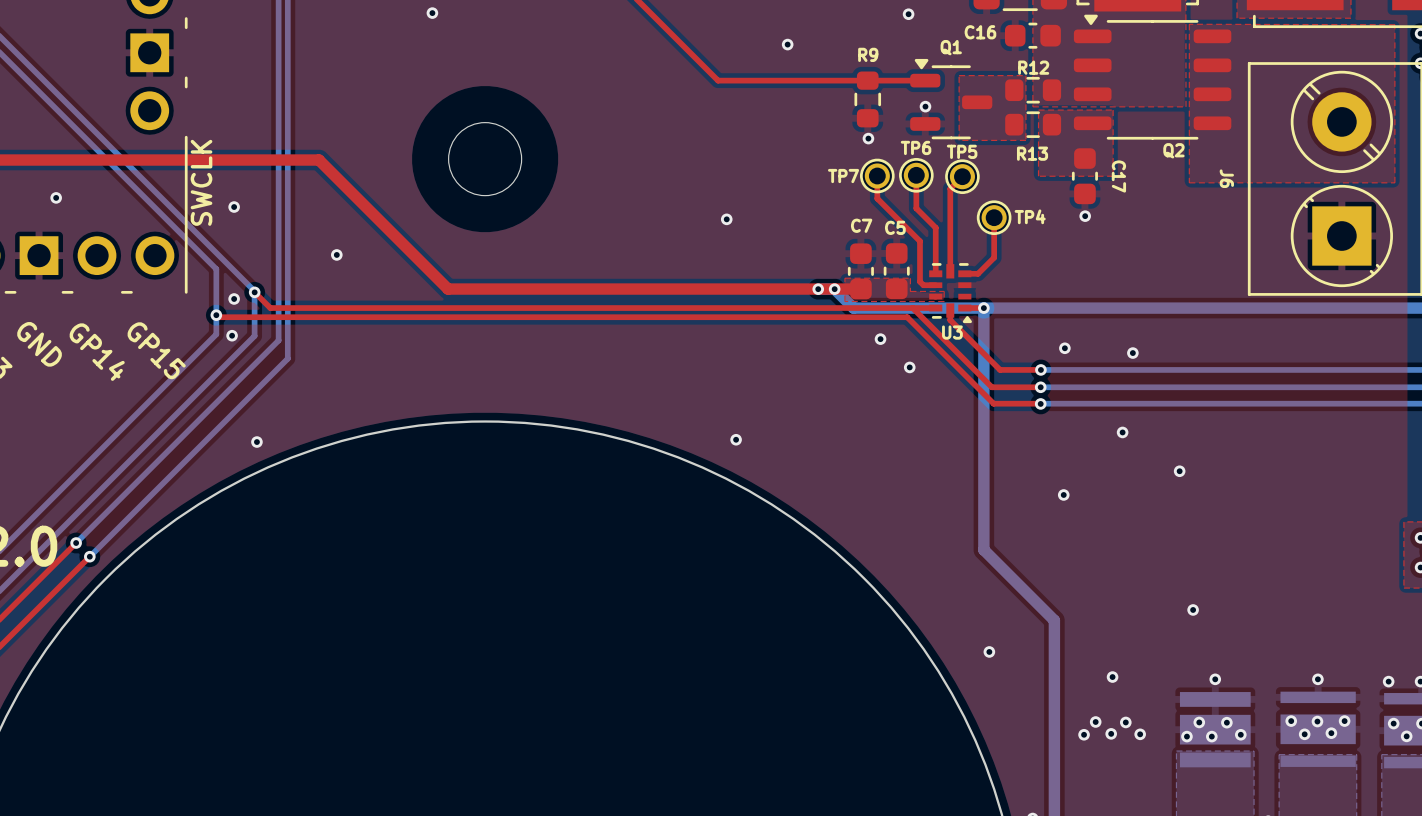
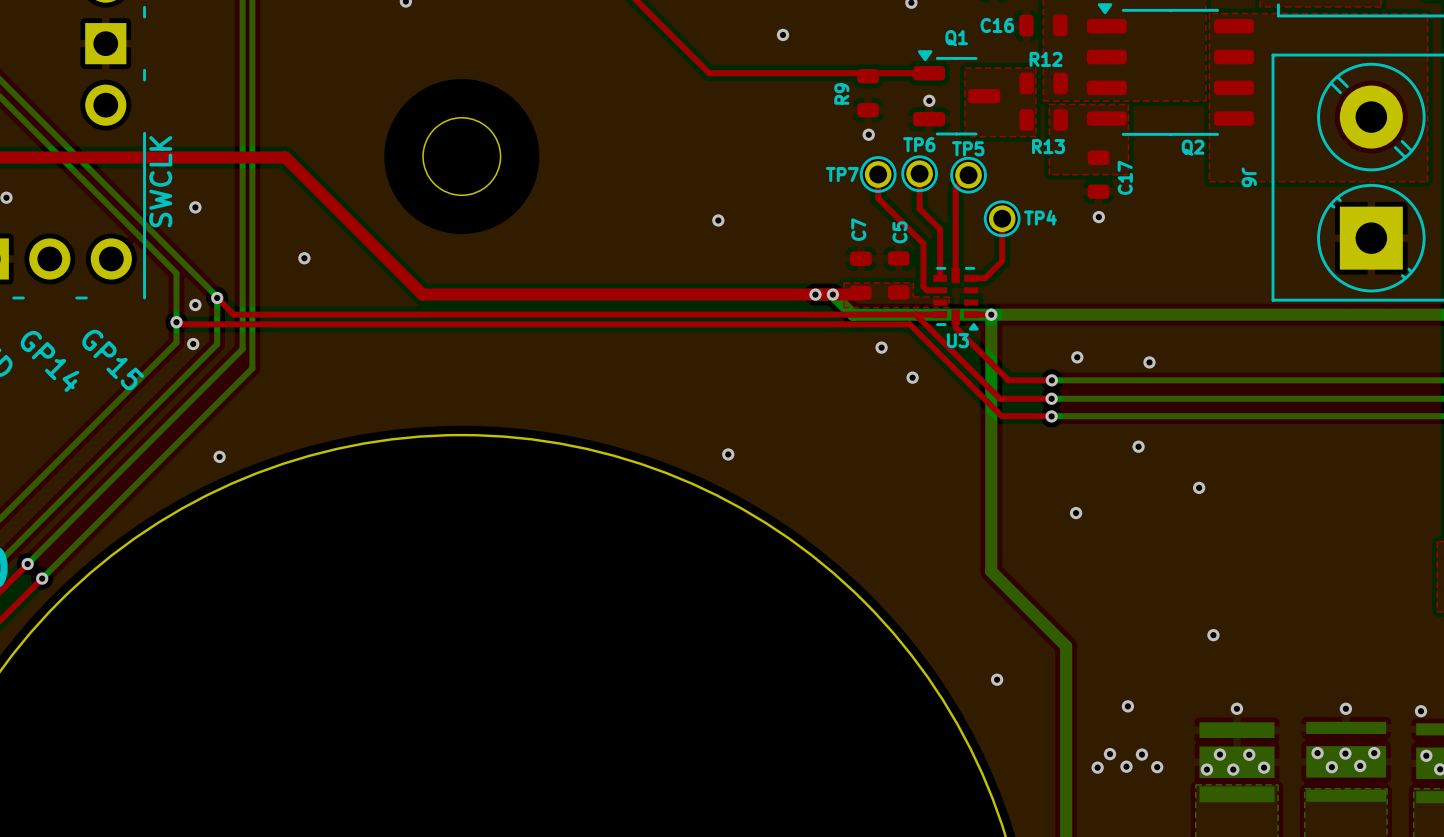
C16 footprint: [1004, 22, 1061, 49] -> [1019, 14, 1068, 37]
R9 name position: R9 (868, 54) -> R9 (841, 93)
R9 footprint: [854, 71, 882, 128] -> [857, 68, 879, 118]
R12 footprint: [1005, 76, 1062, 104] -> [1019, 72, 1068, 95]
R13 footprint: [1005, 111, 1062, 138] -> [1019, 109, 1068, 131]
C17 footprint: [1071, 148, 1098, 205] -> [1087, 150, 1110, 199]
C7 footprint: [847, 243, 874, 300] -> [849, 251, 872, 300]
C5 footprint: [883, 243, 910, 300] -> [887, 251, 910, 300]

